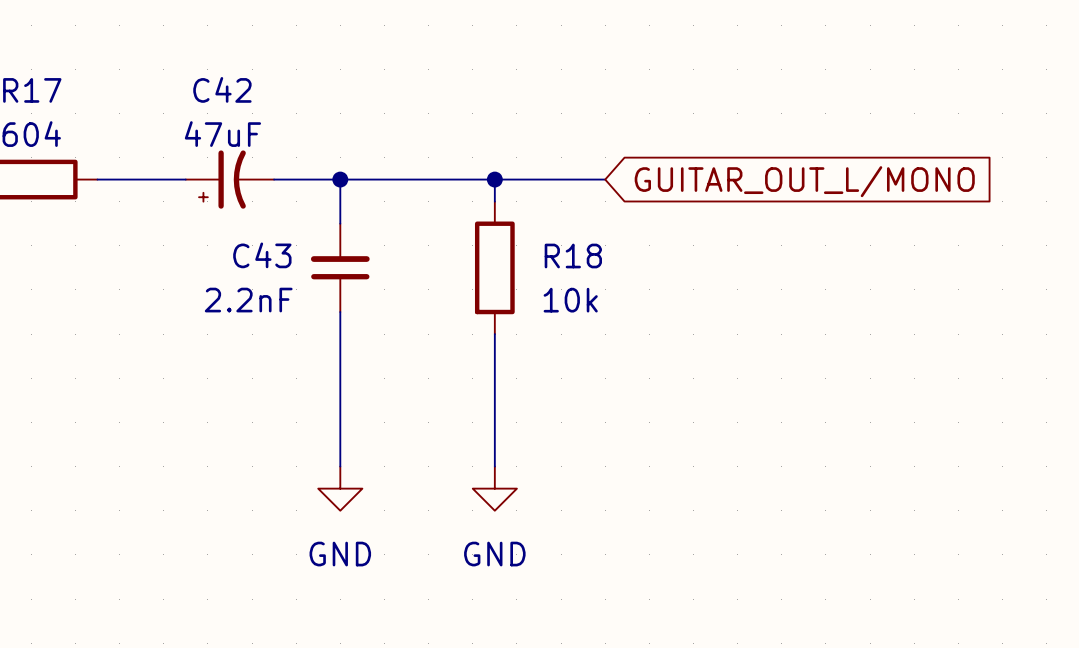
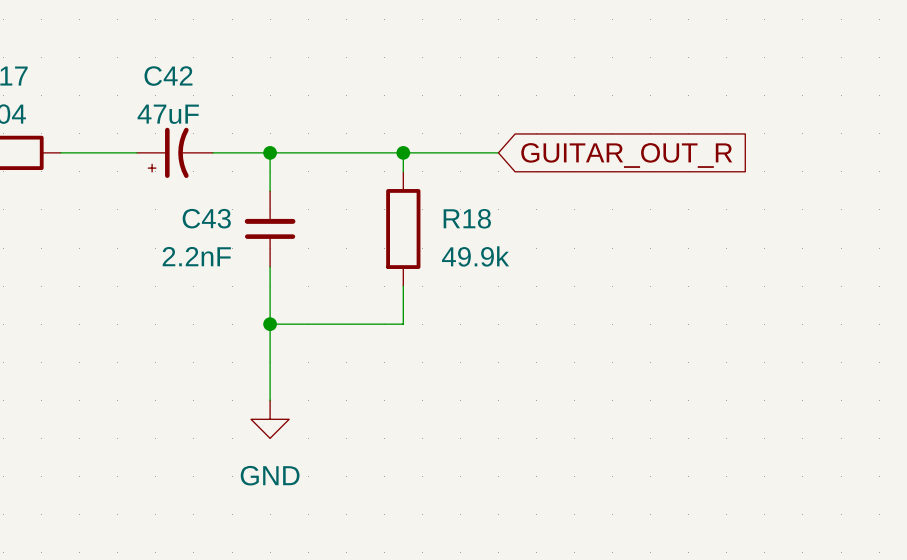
global label: GUITAR_OUT_L/MONO (804, 181) -> GUITAR_OUT_R (626, 155)
R18 value: 10k (570, 300) -> 49.9k (475, 256)
junction: none -> (270, 324)
wire: (494, 378) (494, 466) -> (403, 324) (270, 324)
power symbol: GND (494, 488) -> none

